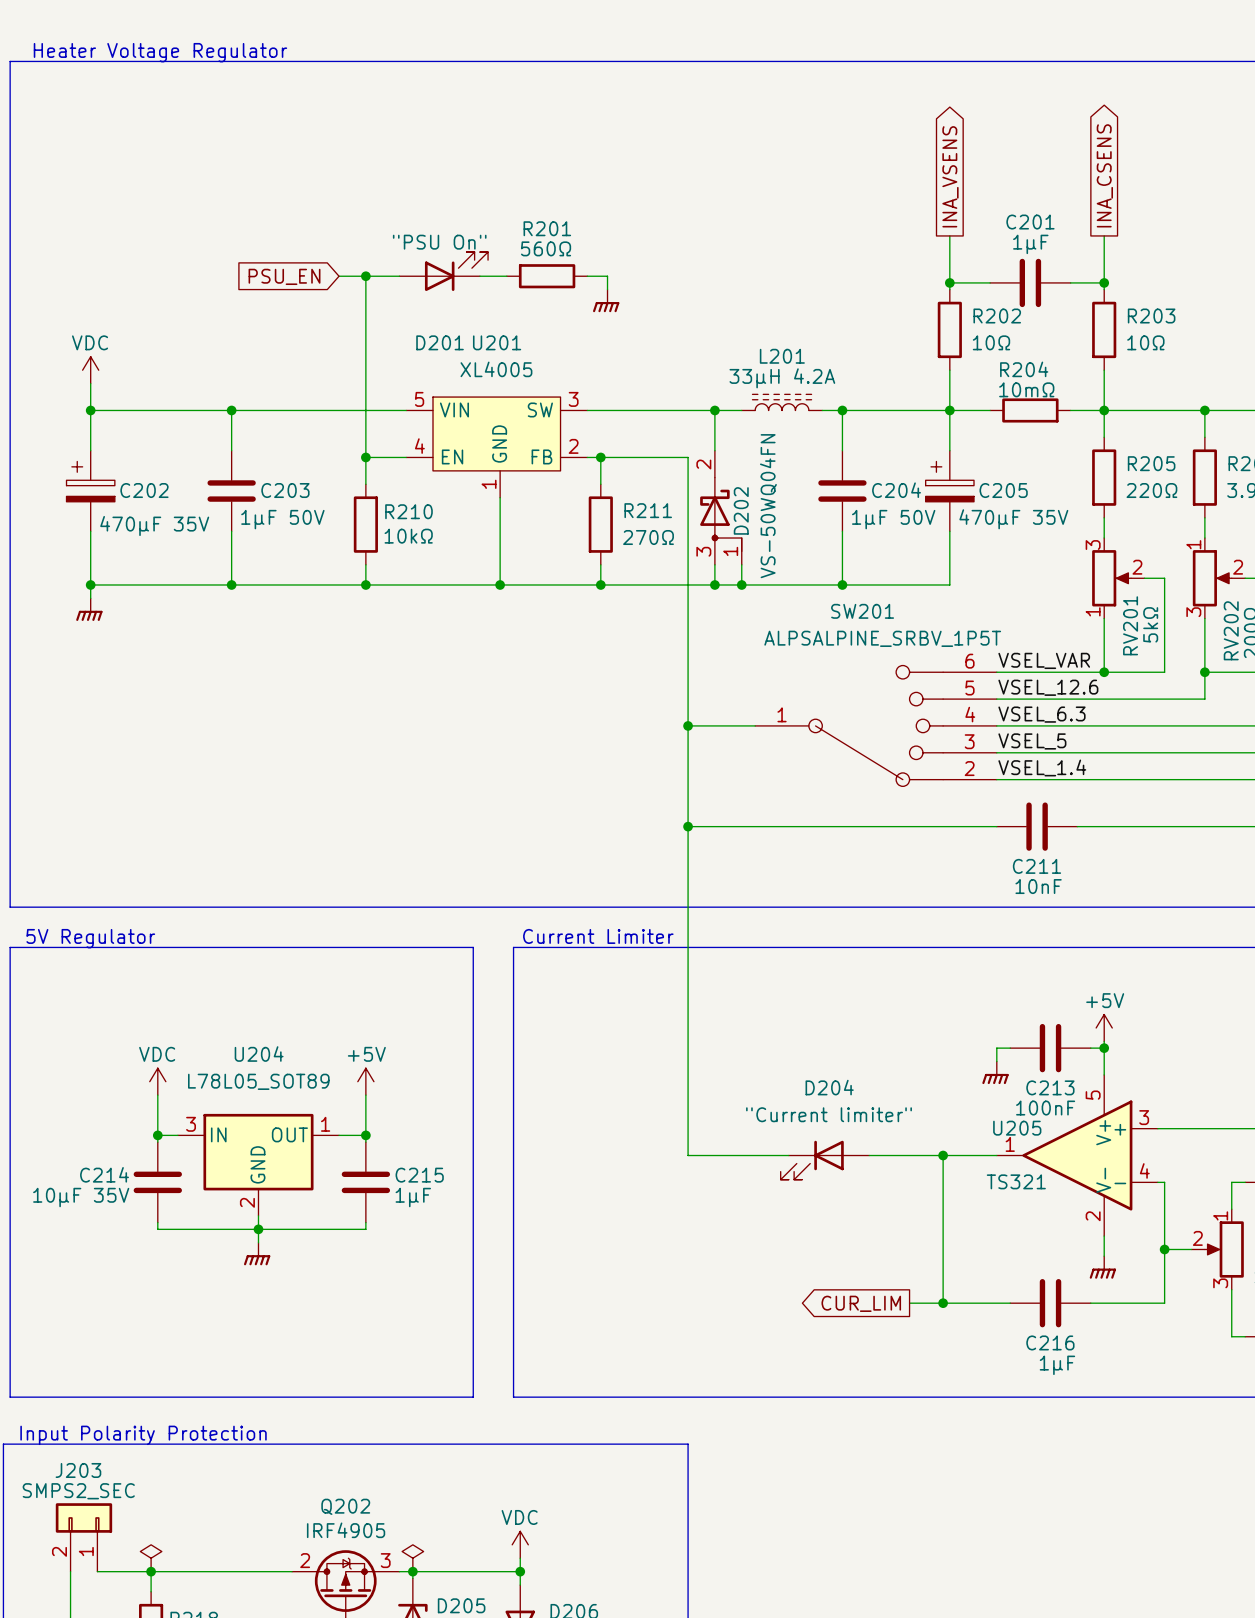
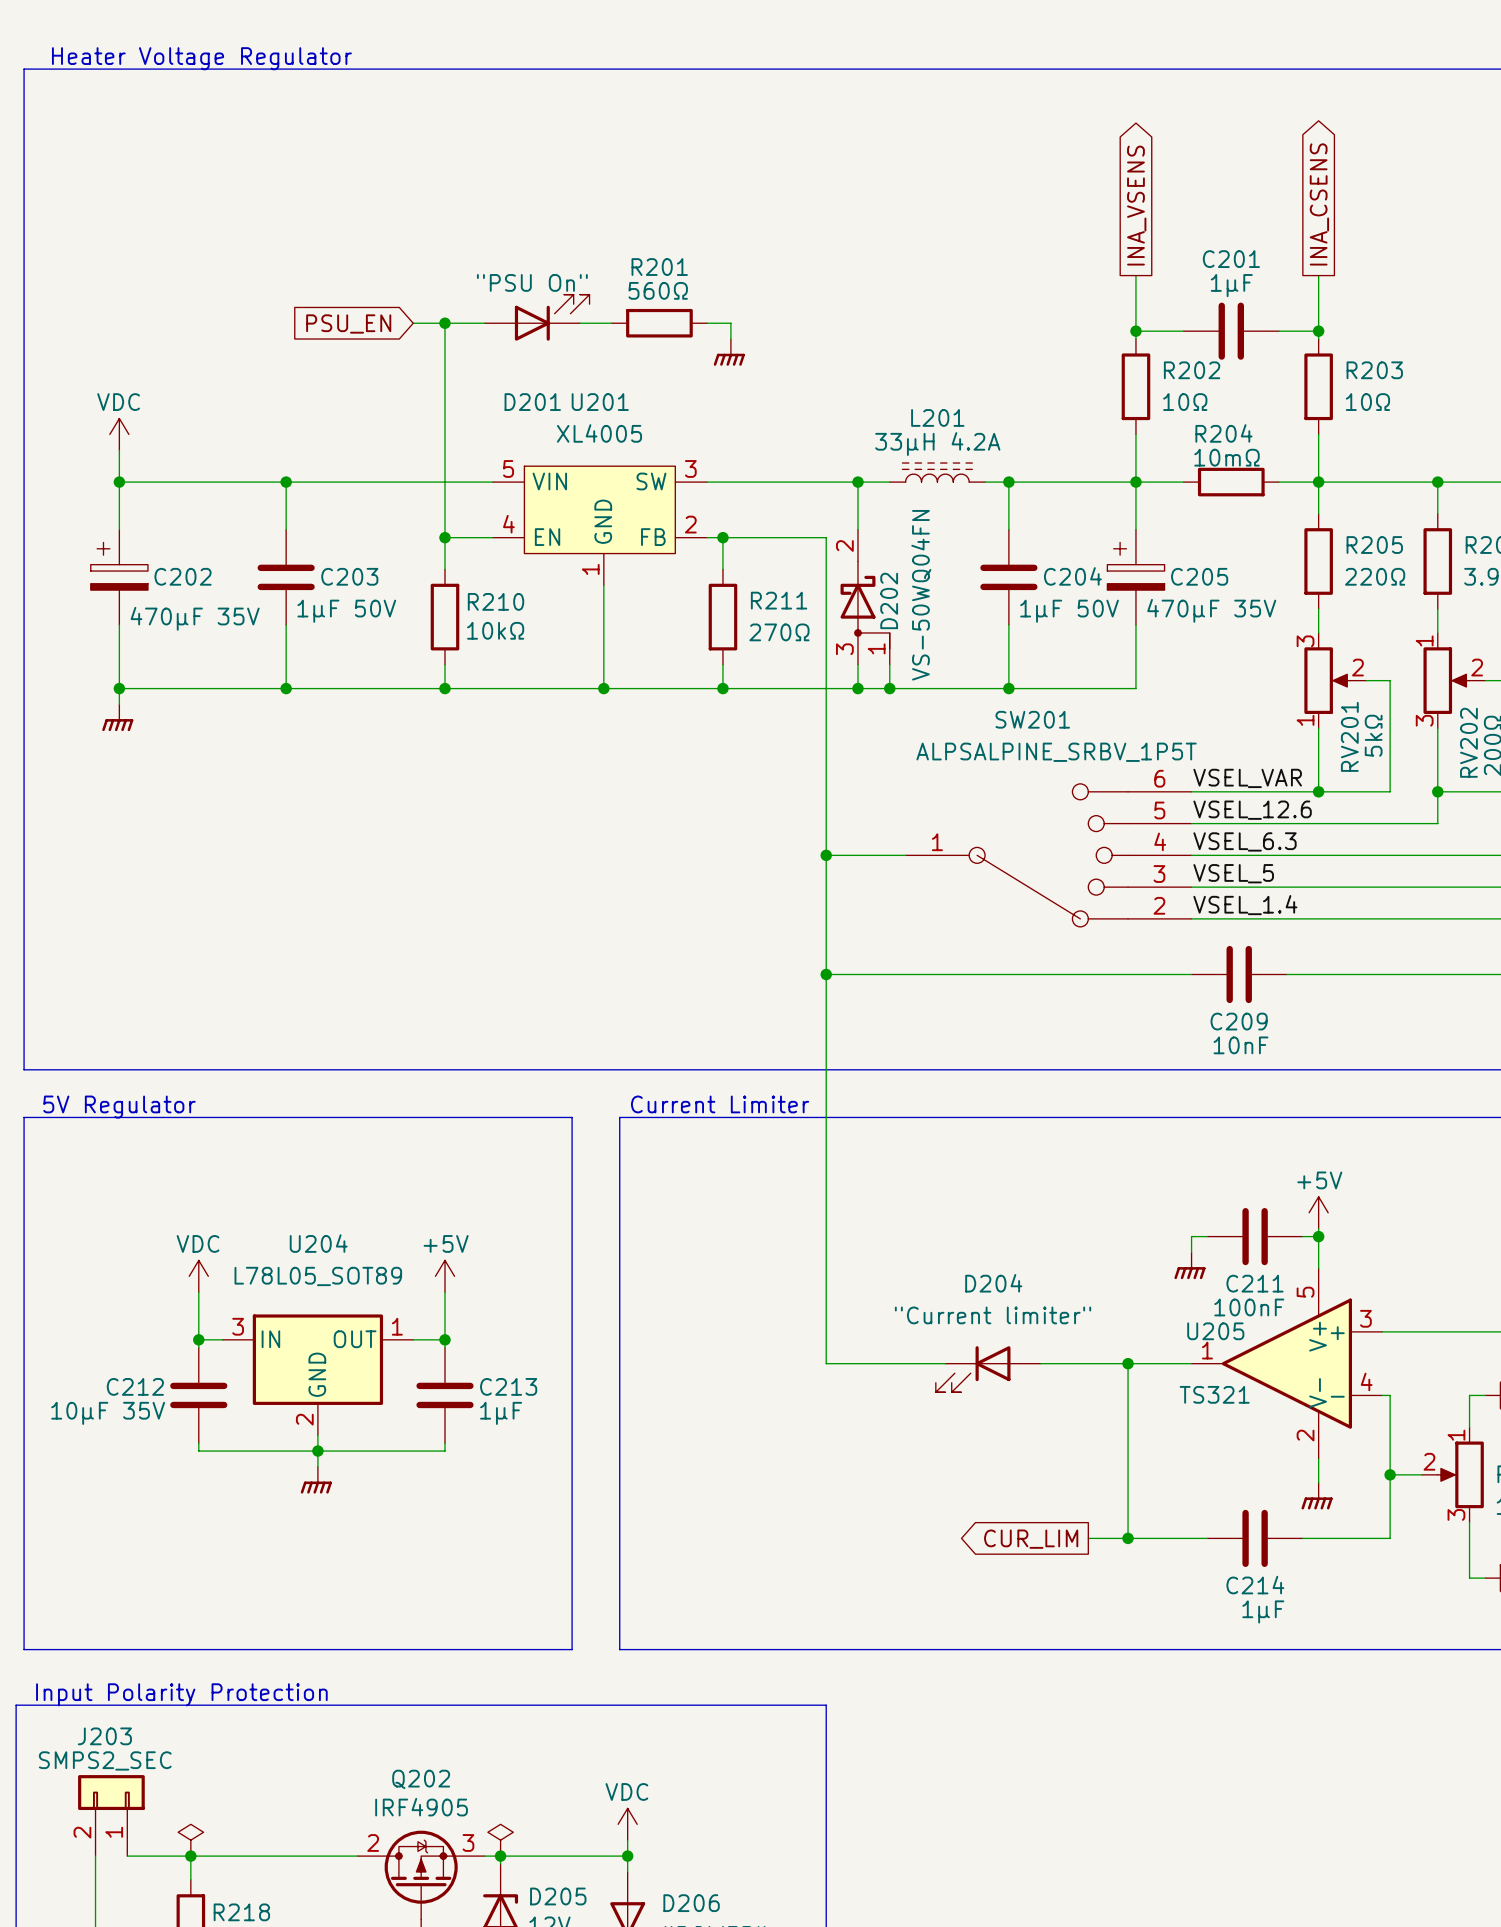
C211 name: C211 (1036, 866) -> C209 (1239, 1021)
C213 name: C213 (1050, 1087) -> C211 (1254, 1283)
C214 name: C214 (104, 1174) -> C212 (135, 1386)
C215 name: C215 (419, 1175) -> C213 (508, 1386)
C216 name: C216 (1050, 1342) -> C214 (1255, 1585)

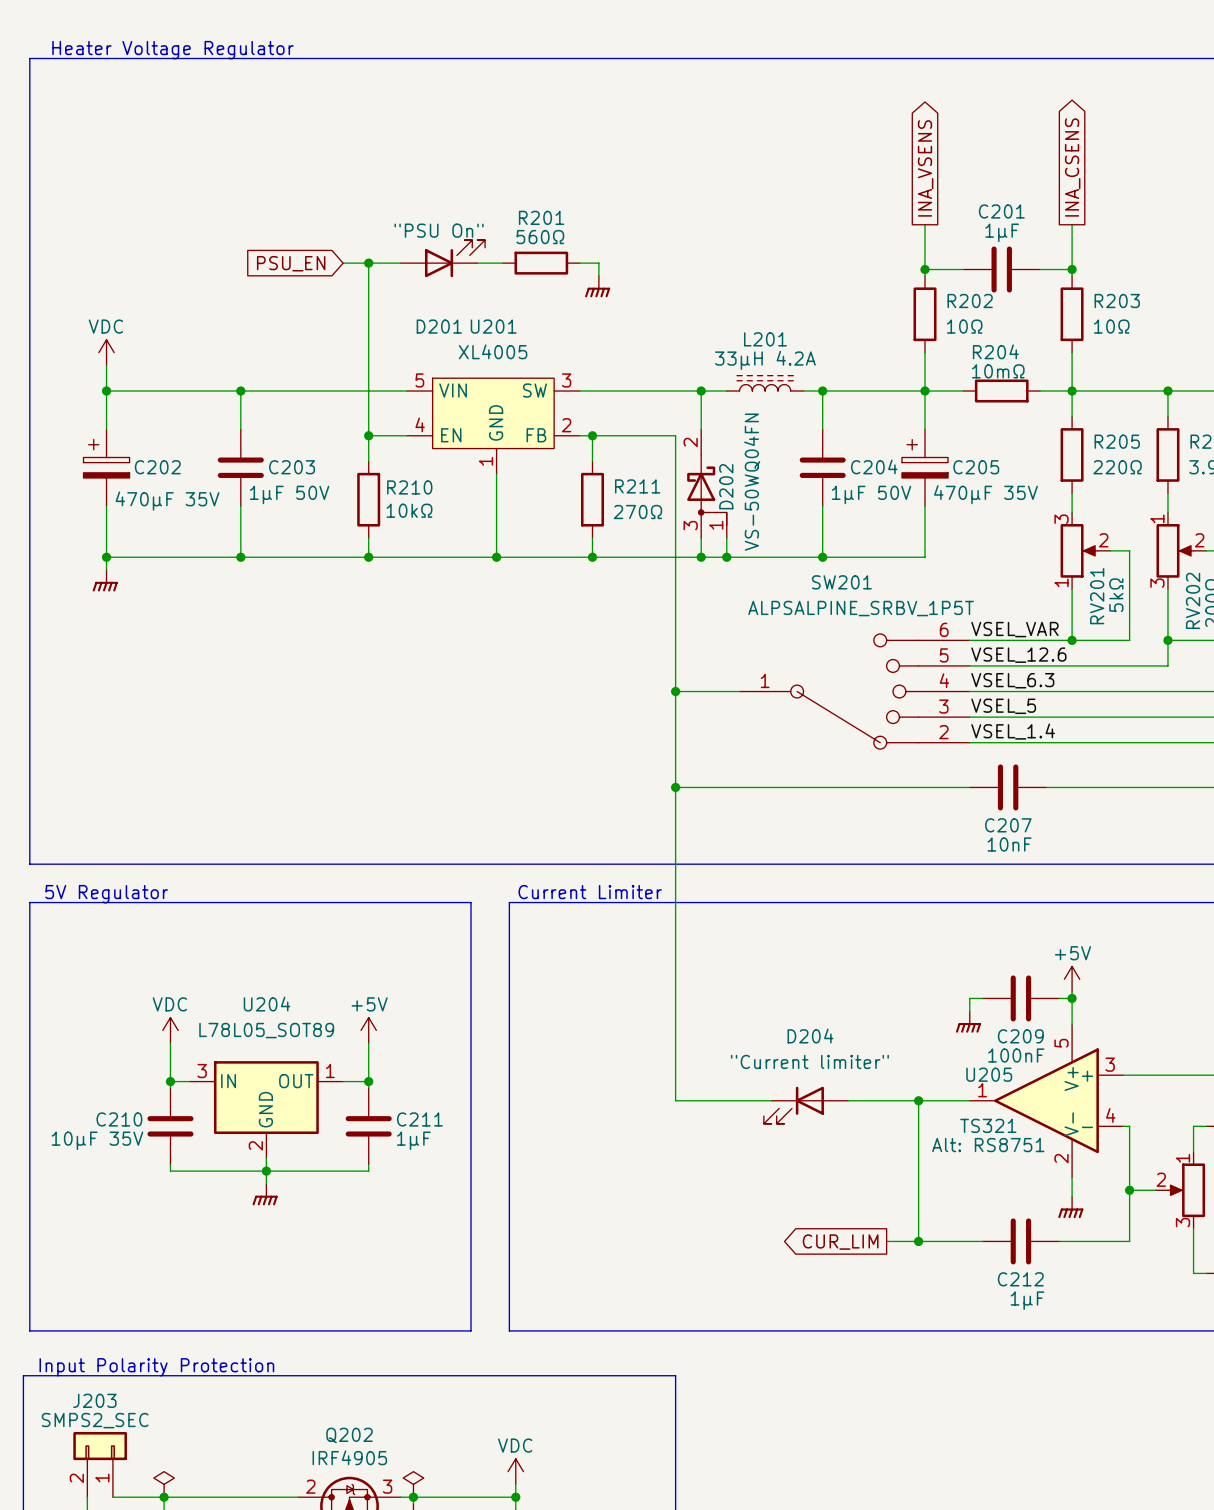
C209 name: C209 (1239, 1021) -> C207 (1008, 825)
C211 name: C211 (1254, 1283) -> C209 (1020, 1036)
C212 name: C212 (135, 1386) -> C210 (119, 1119)
C213 name: C213 (508, 1386) -> C211 (419, 1119)
U205 text: none -> Alt: RS8751 (988, 1145)
C214 name: C214 (1255, 1585) -> C212 (1020, 1279)

